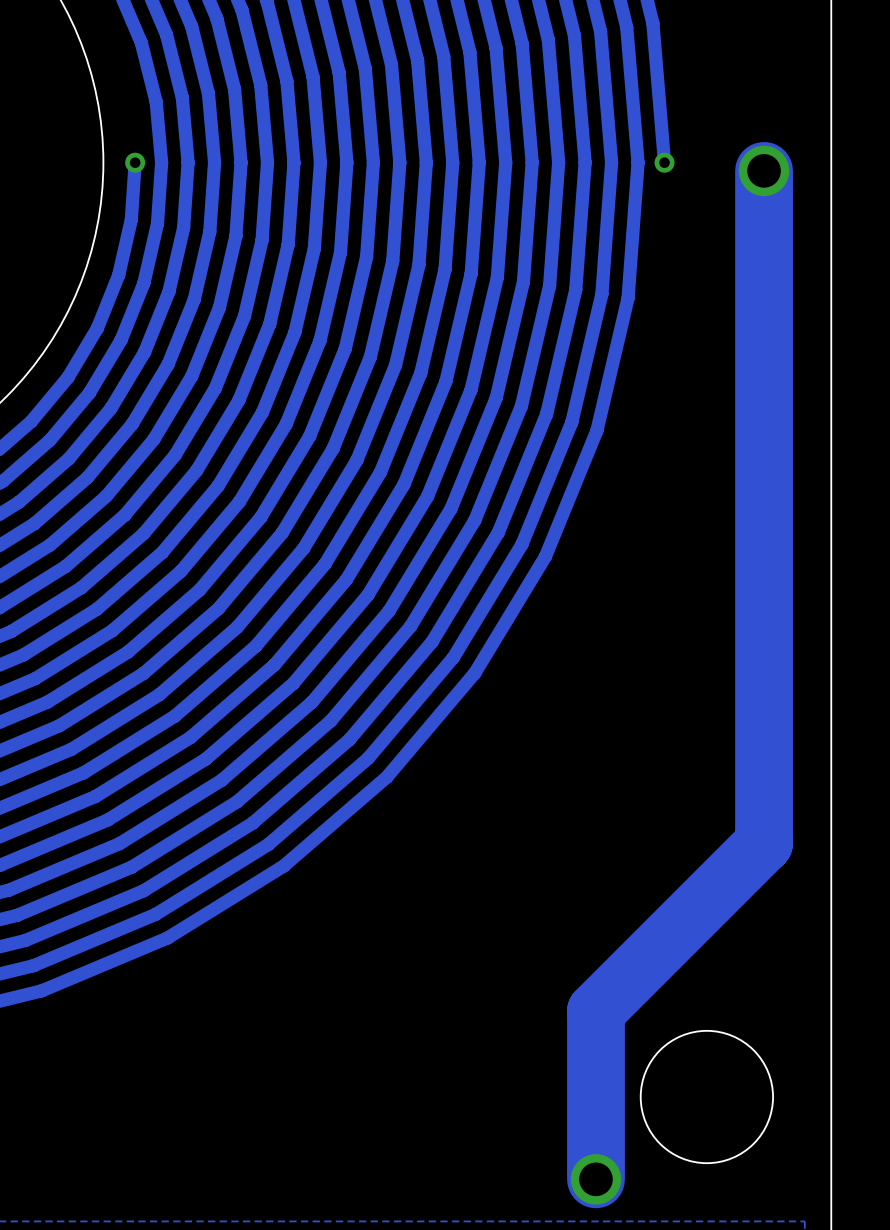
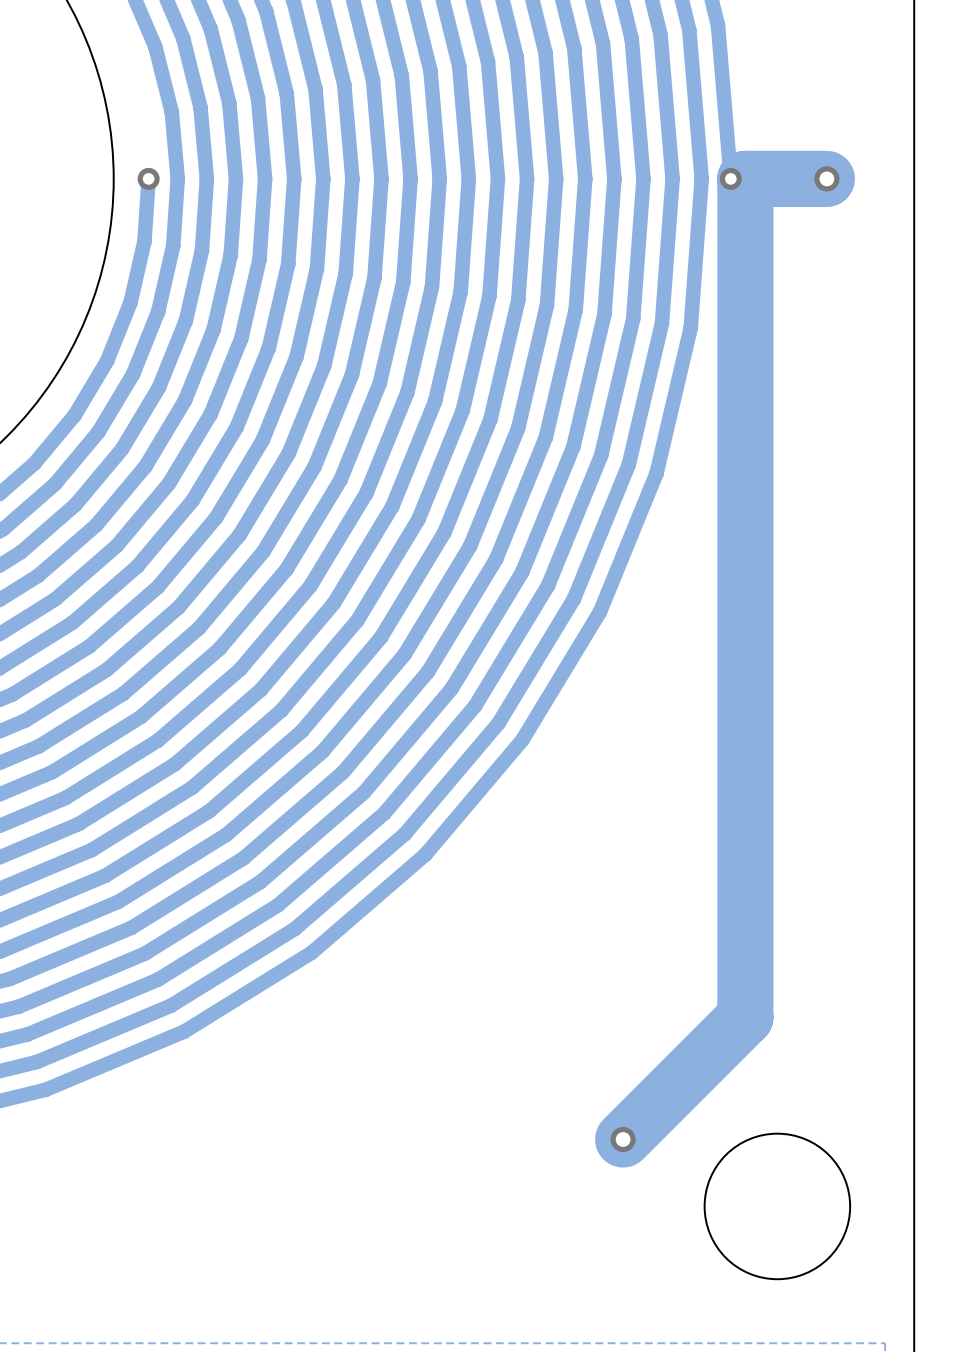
via size: [738, 145, 790, 197] -> [814, 166, 840, 192]
track: none -> (826, 178) (745, 178) (745, 1017) (623, 1139)
track: (764, 170) (764, 843) (595, 1011) (595, 1179) -> none
via: none -> (623, 1139)
via: (595, 1179) -> none

